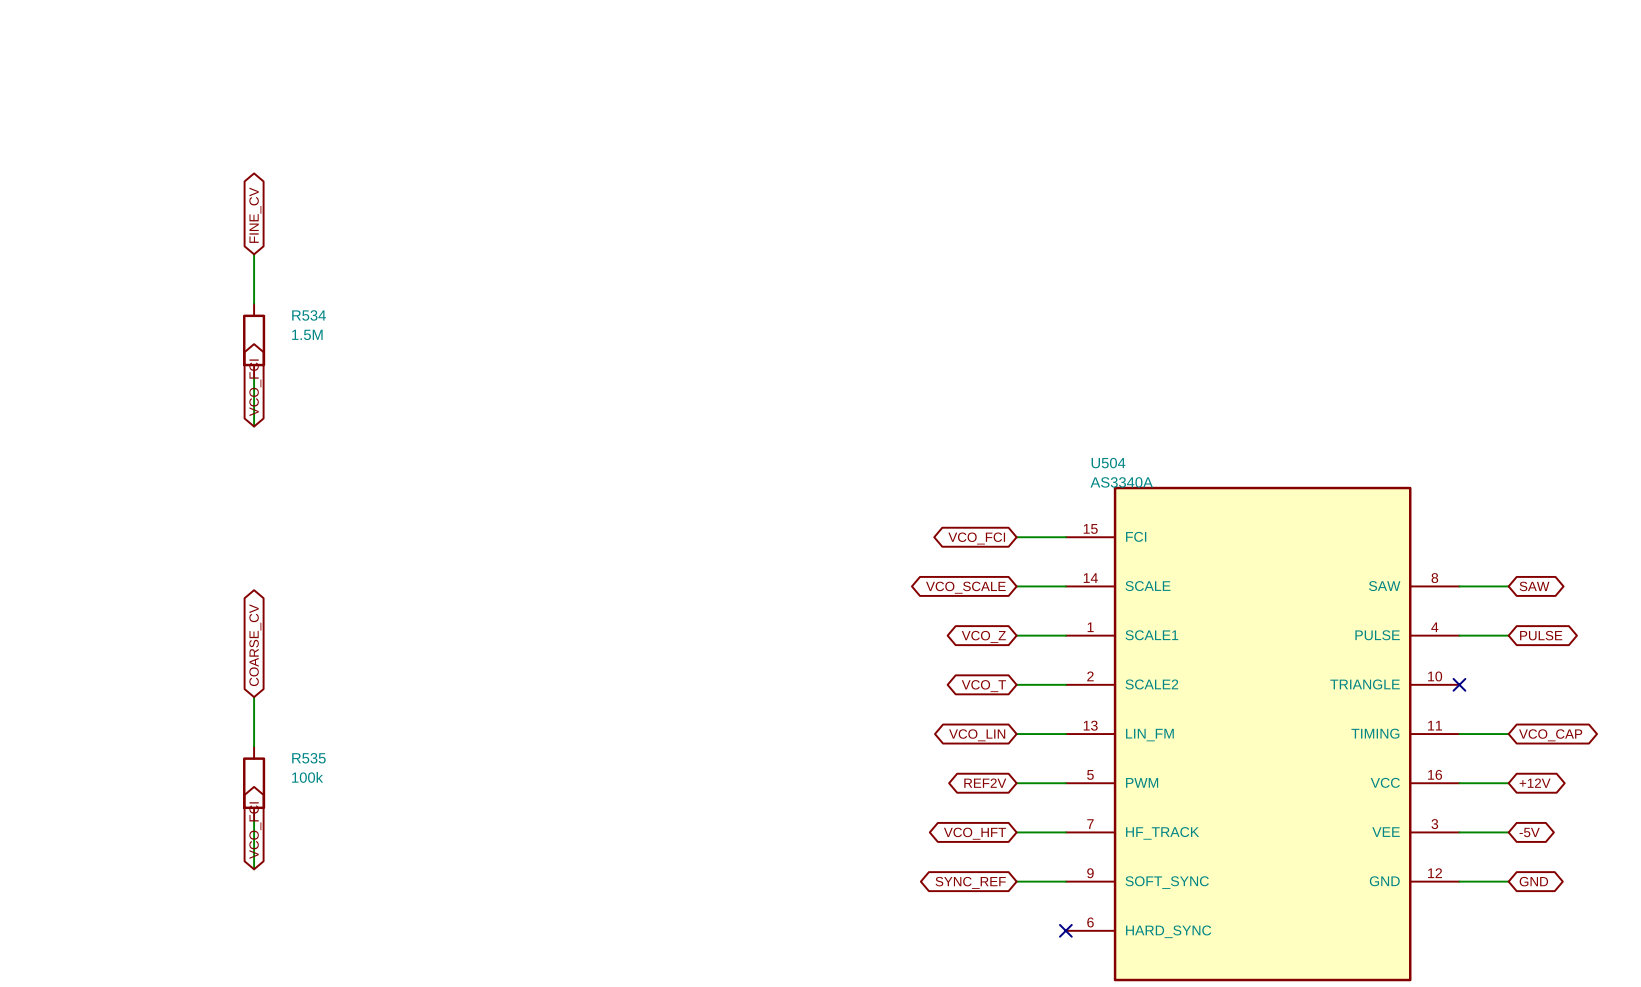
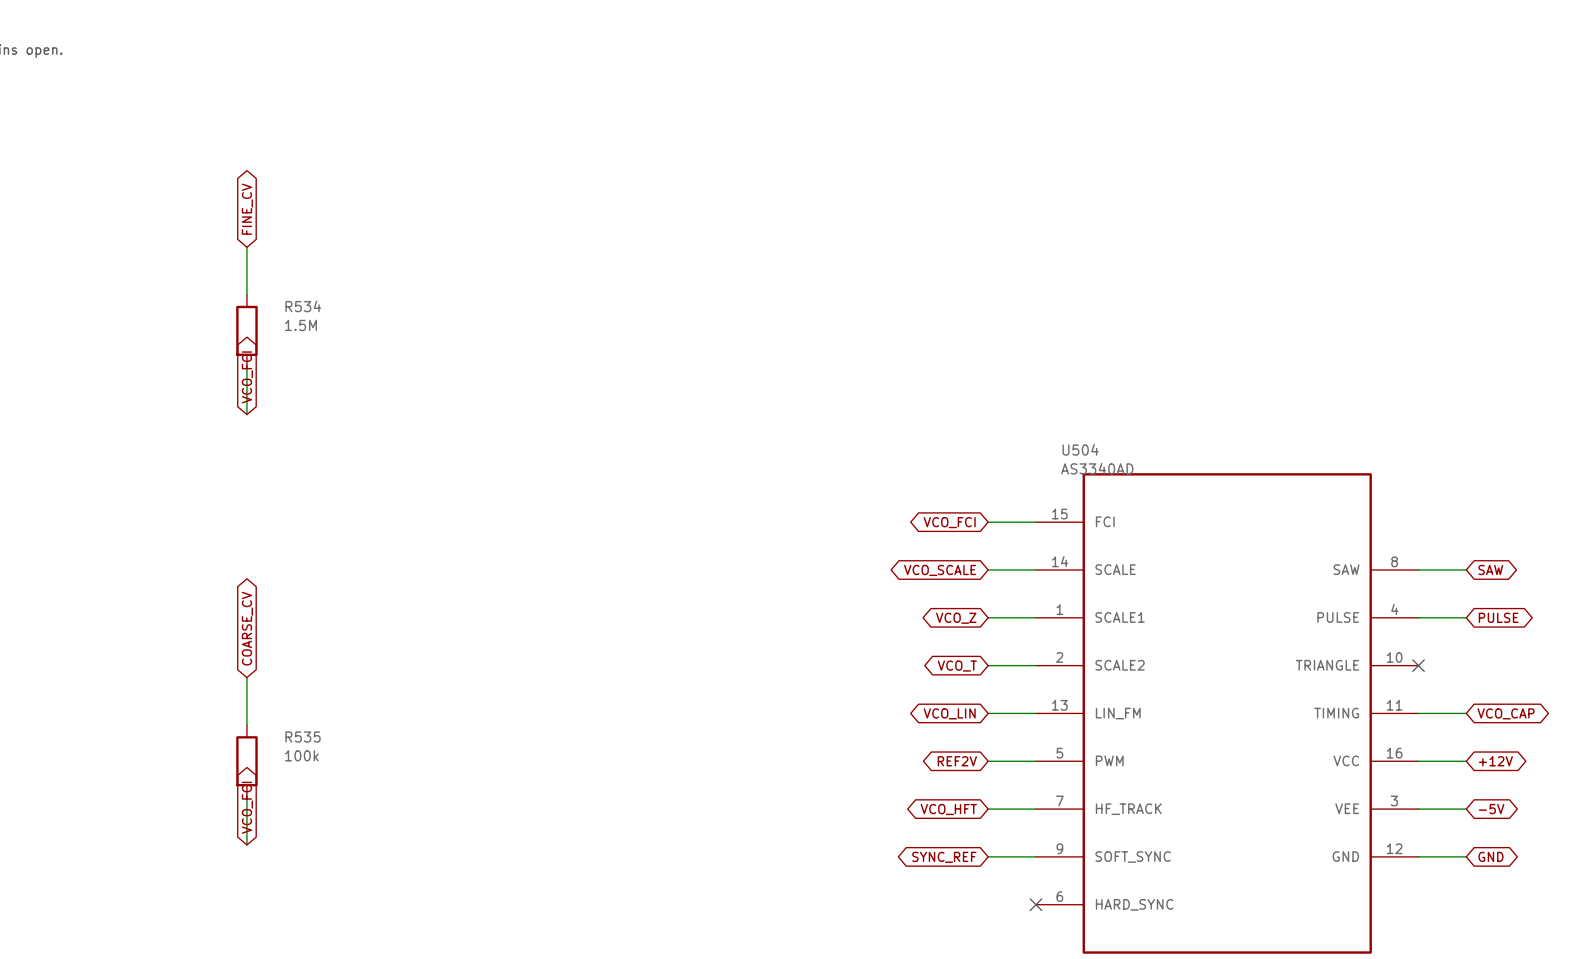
U504 value: AS3340A (1121, 482) -> AS3340AD (1097, 468)

